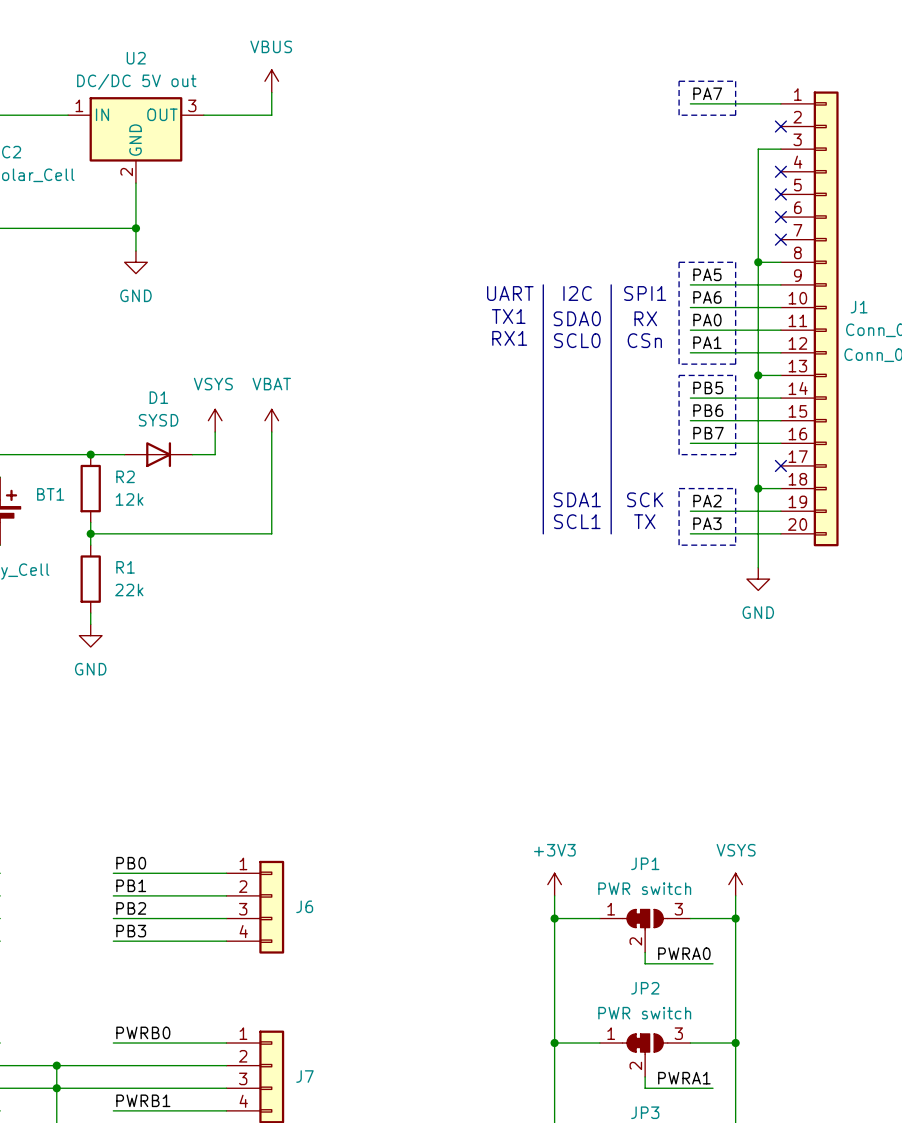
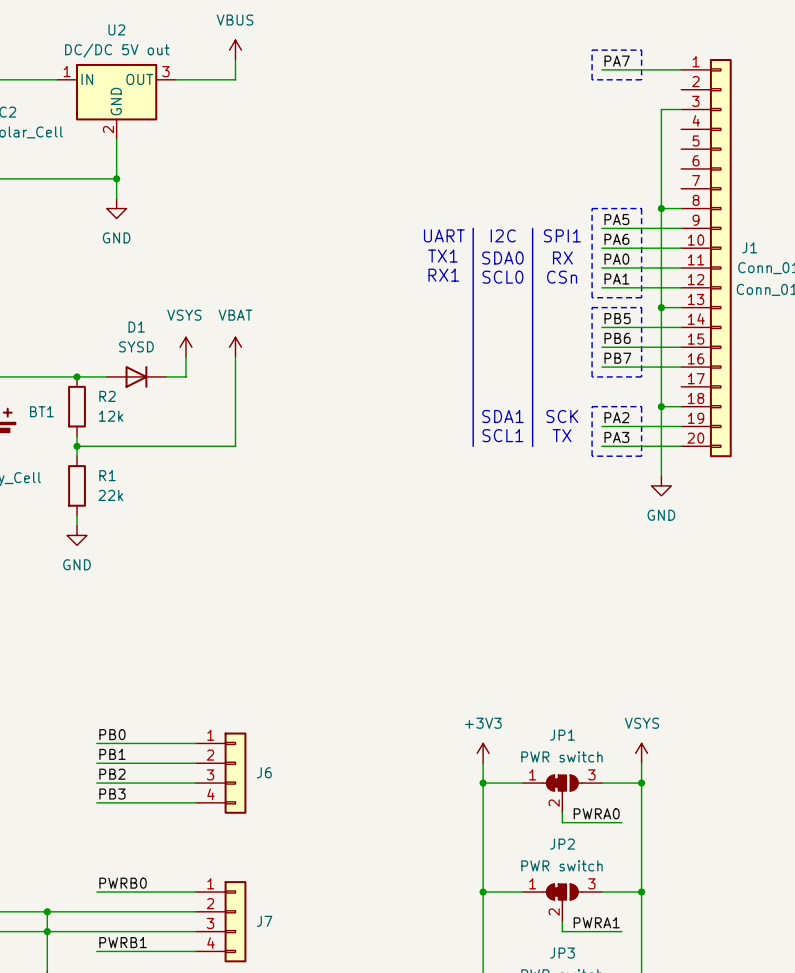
no-connect mark: (780, 126) -> none
no-connect mark: (780, 171) -> none
no-connect mark: (780, 194) -> none
no-connect mark: (780, 217) -> none
no-connect mark: (780, 239) -> none
no-connect mark: (780, 465) -> none

